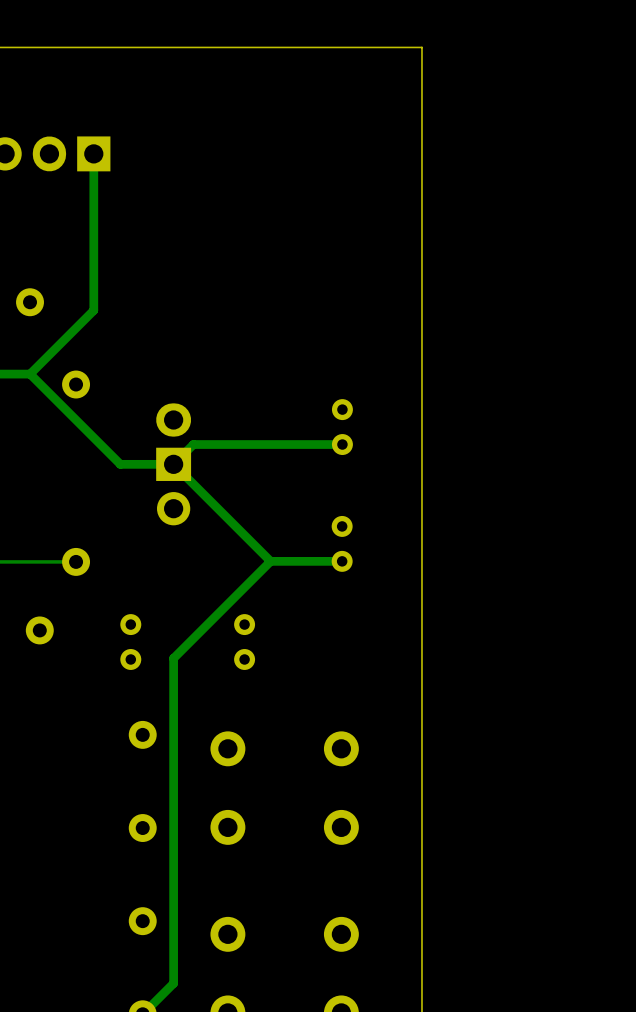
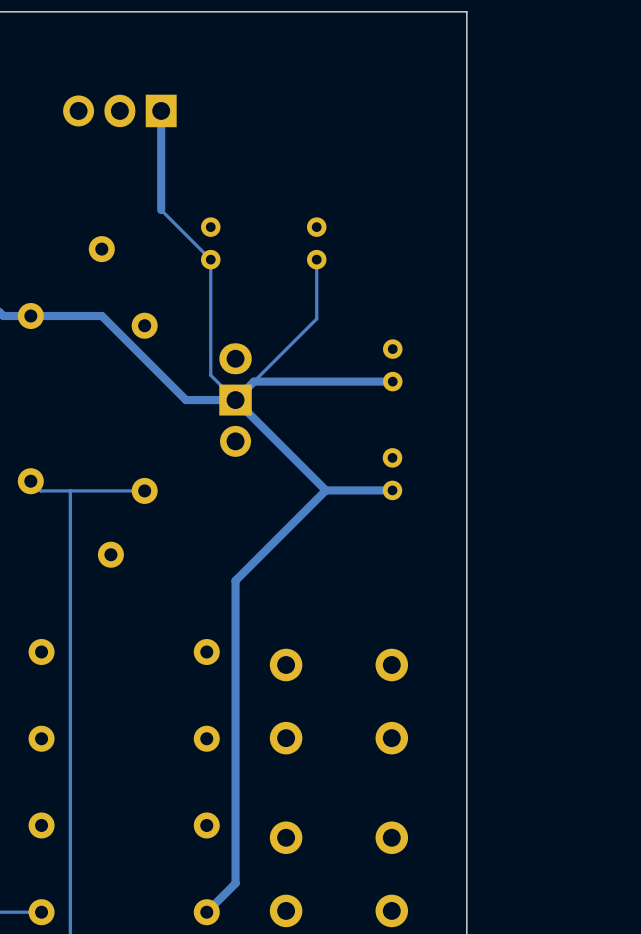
track: (93, 260) (93, 310) (30, 374) -> (161, 210) (210, 259) (210, 375) (235, 400)
part: none -> (210, 243)
part: none -> (316, 243)
track: none -> (316, 259) (316, 318) (254, 381)
part: (130, 642) -> none
part: (244, 642) -> none

